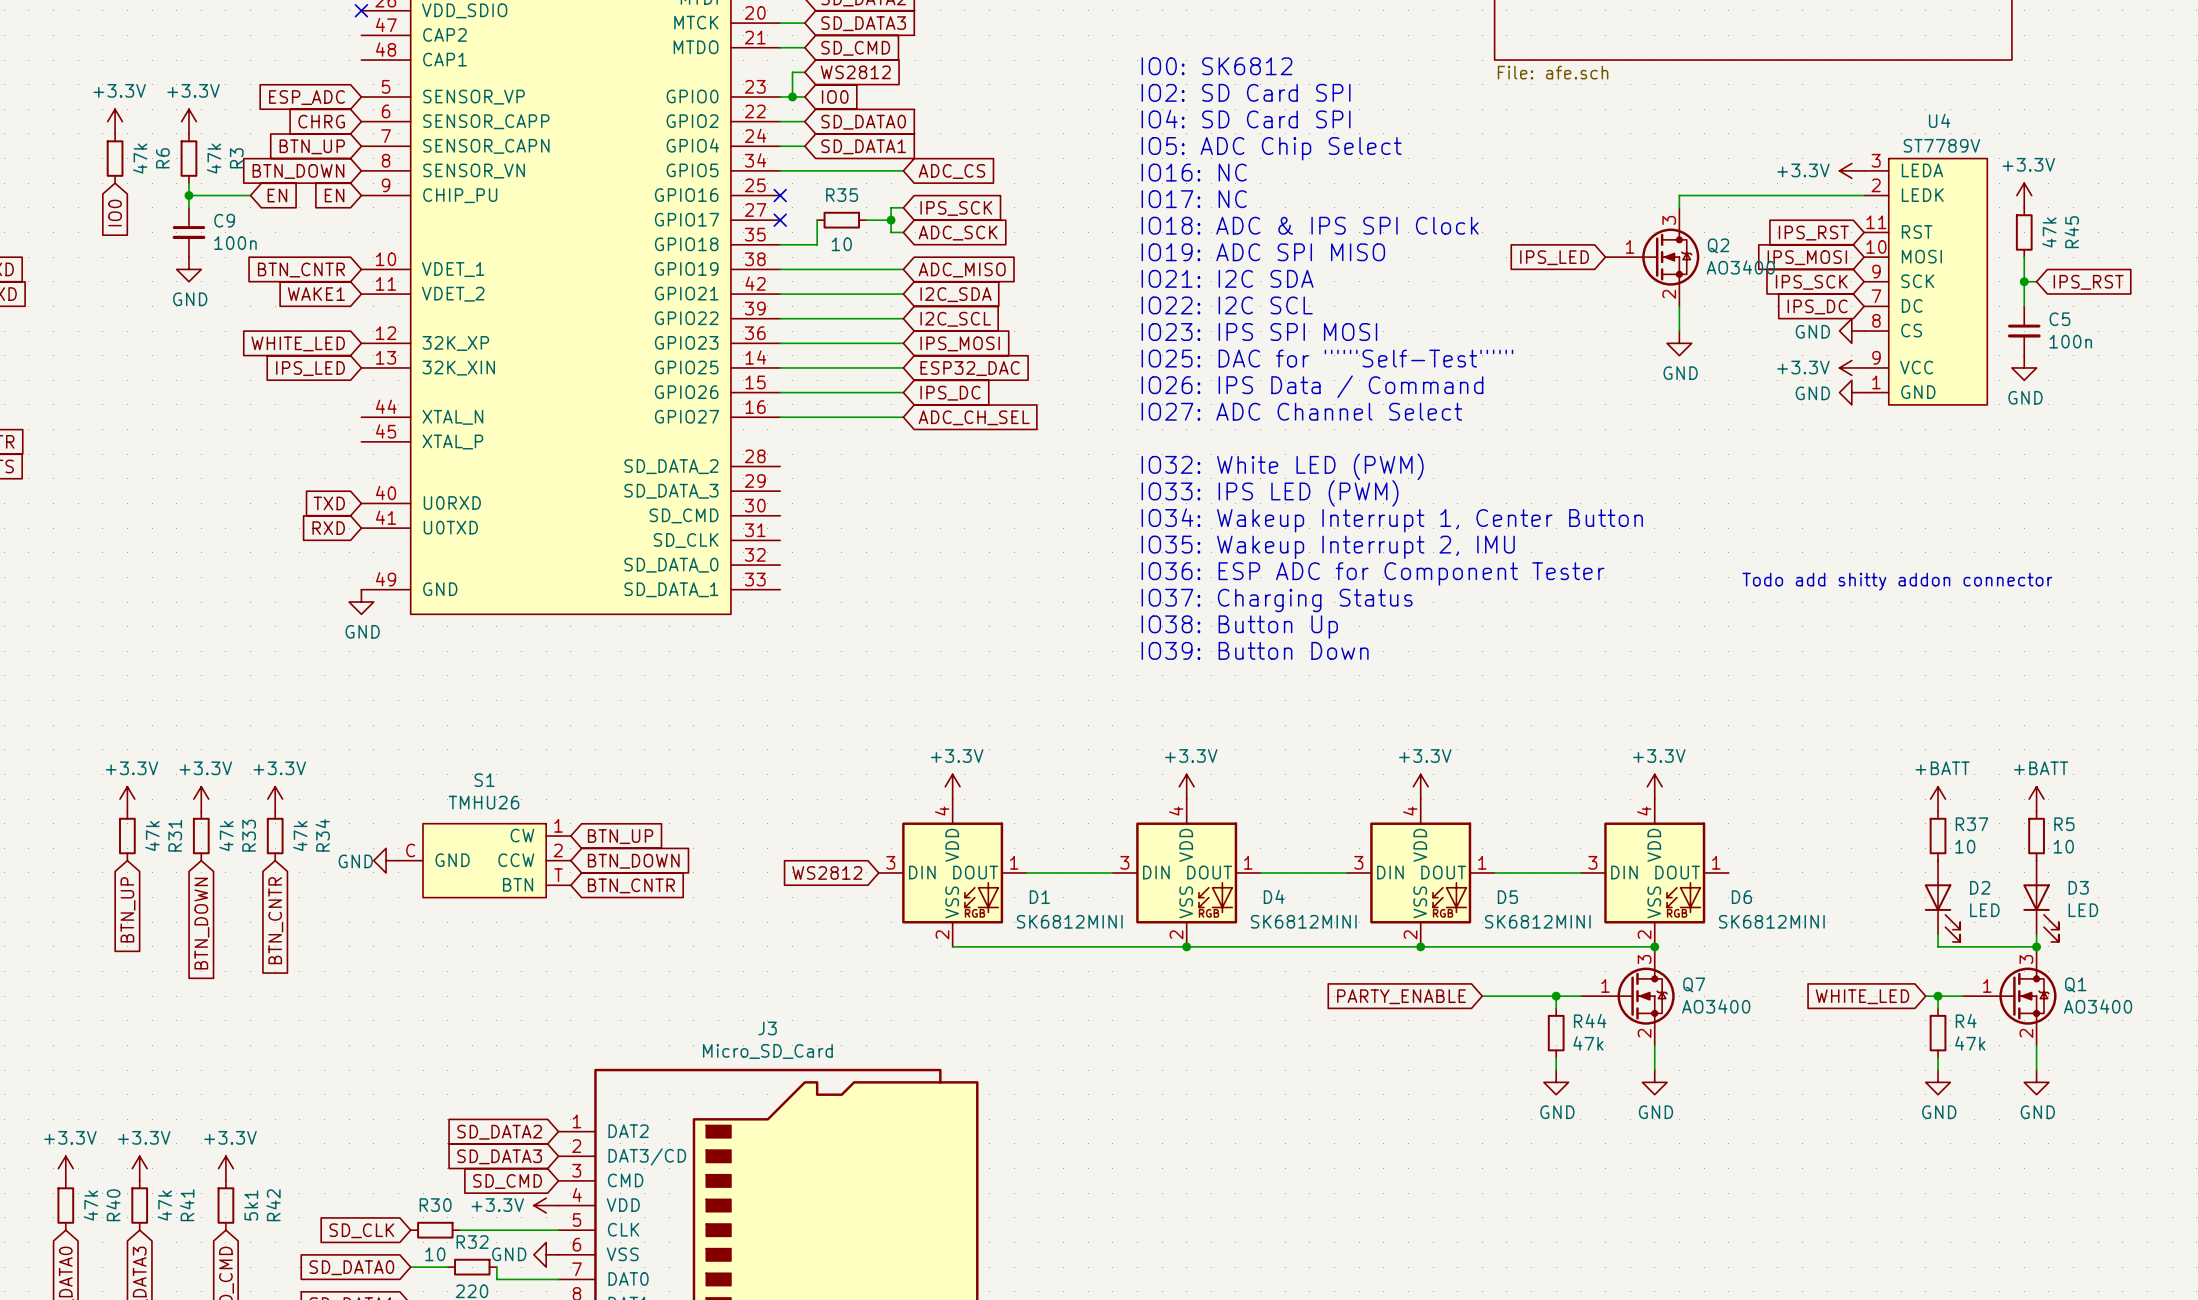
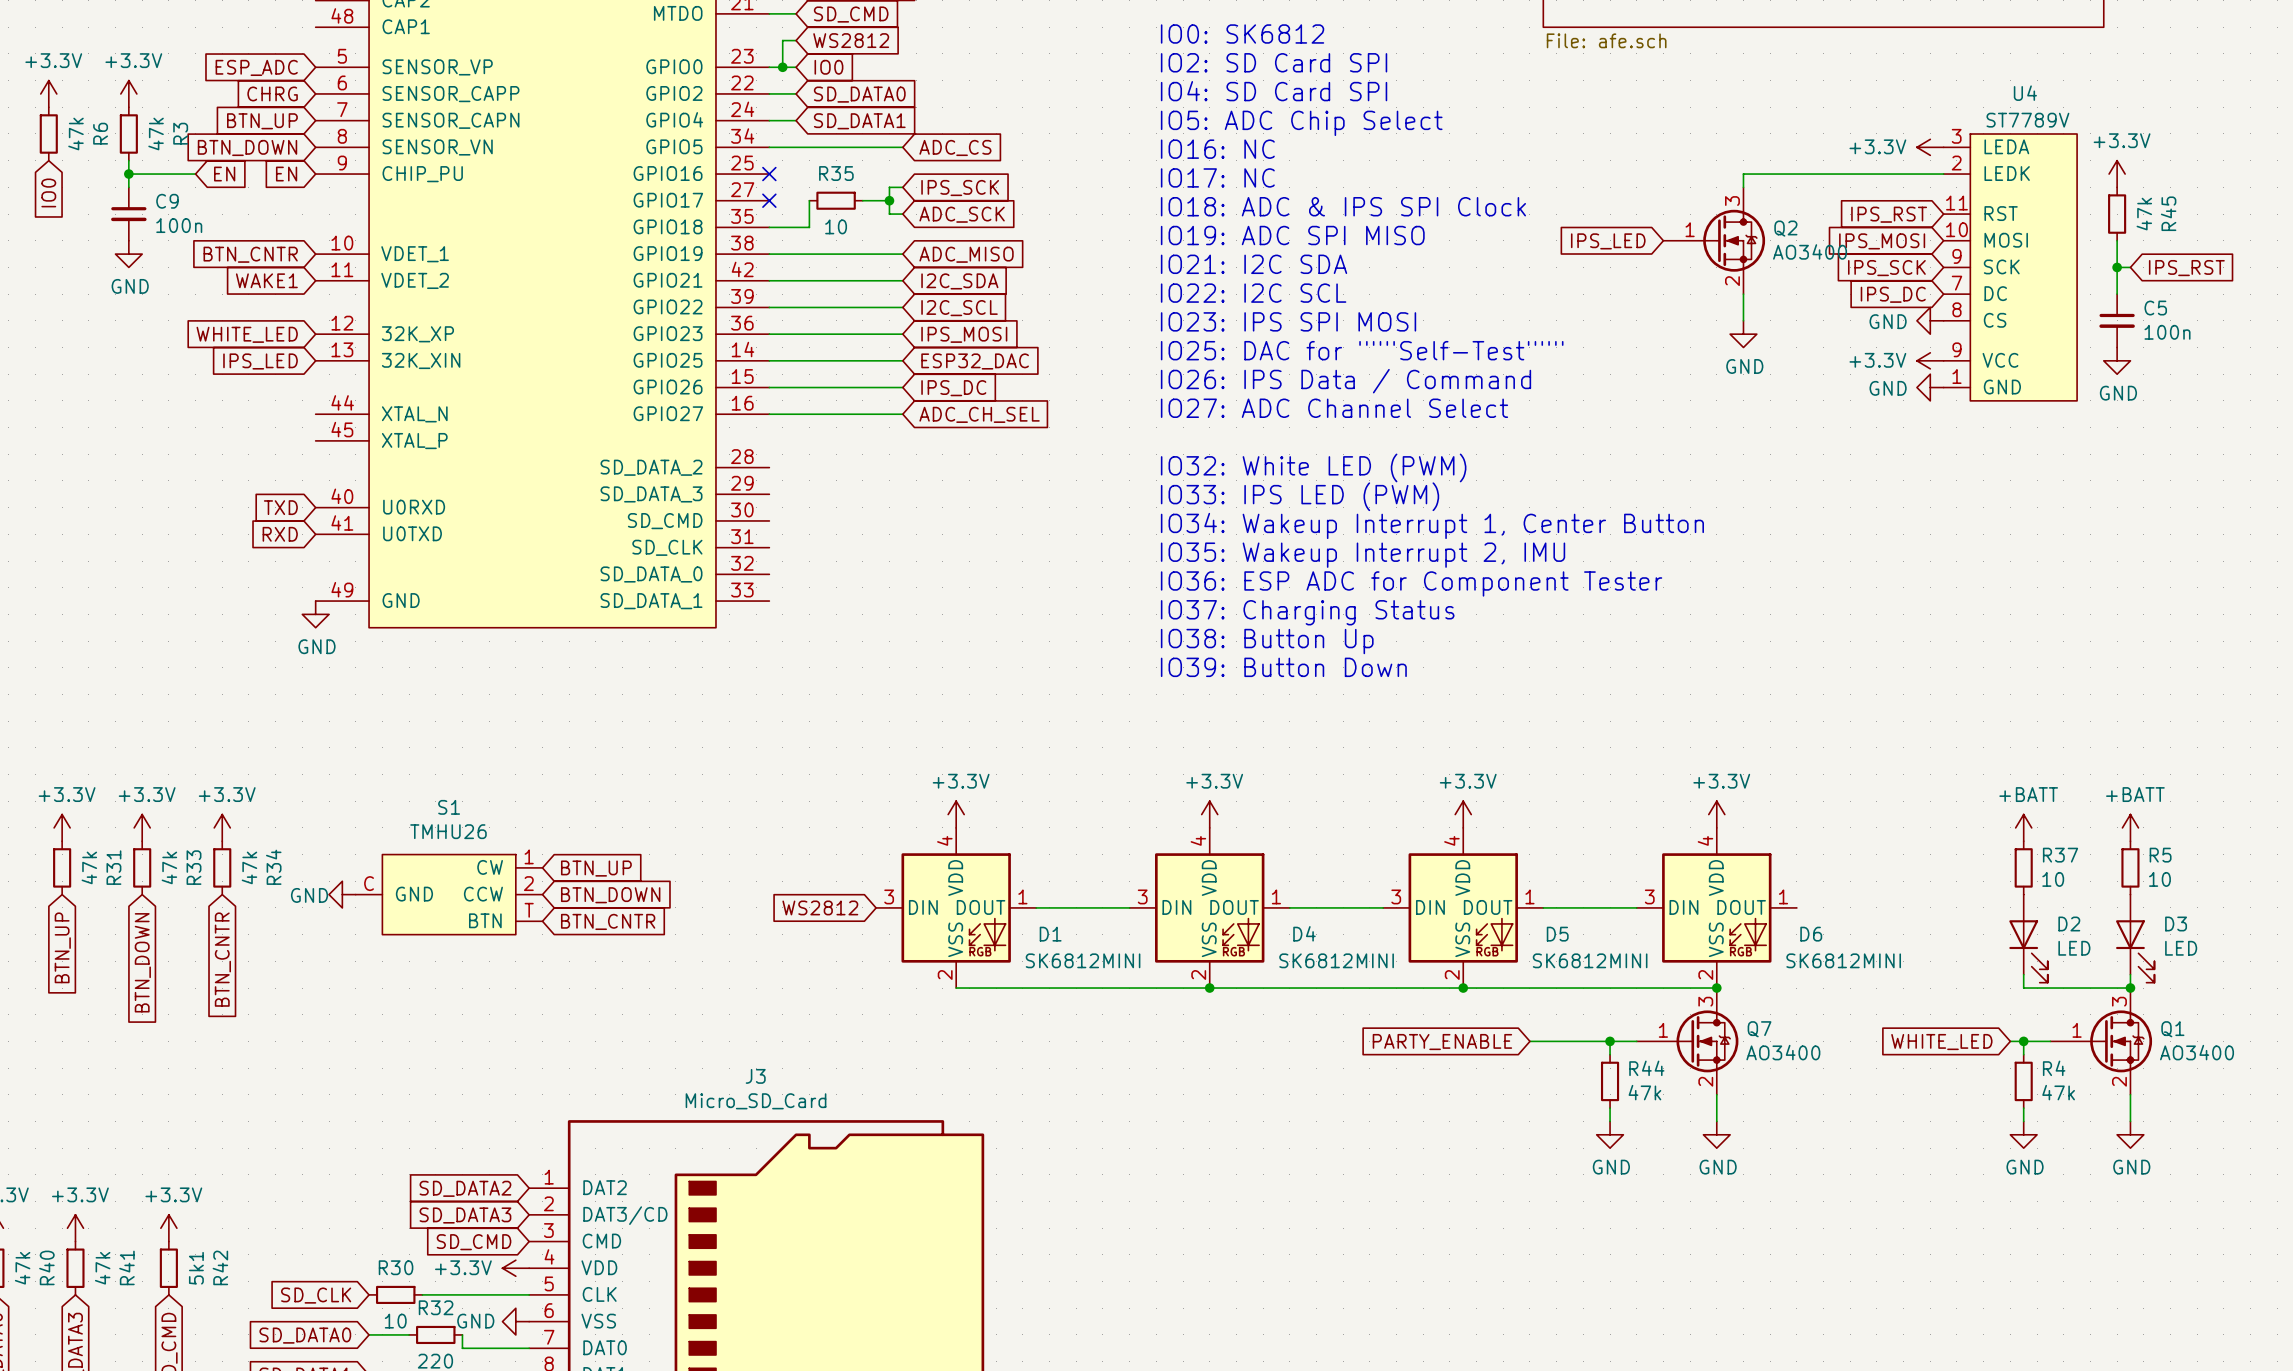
text: Todo add shitty addon connector (1897, 581) -> none

